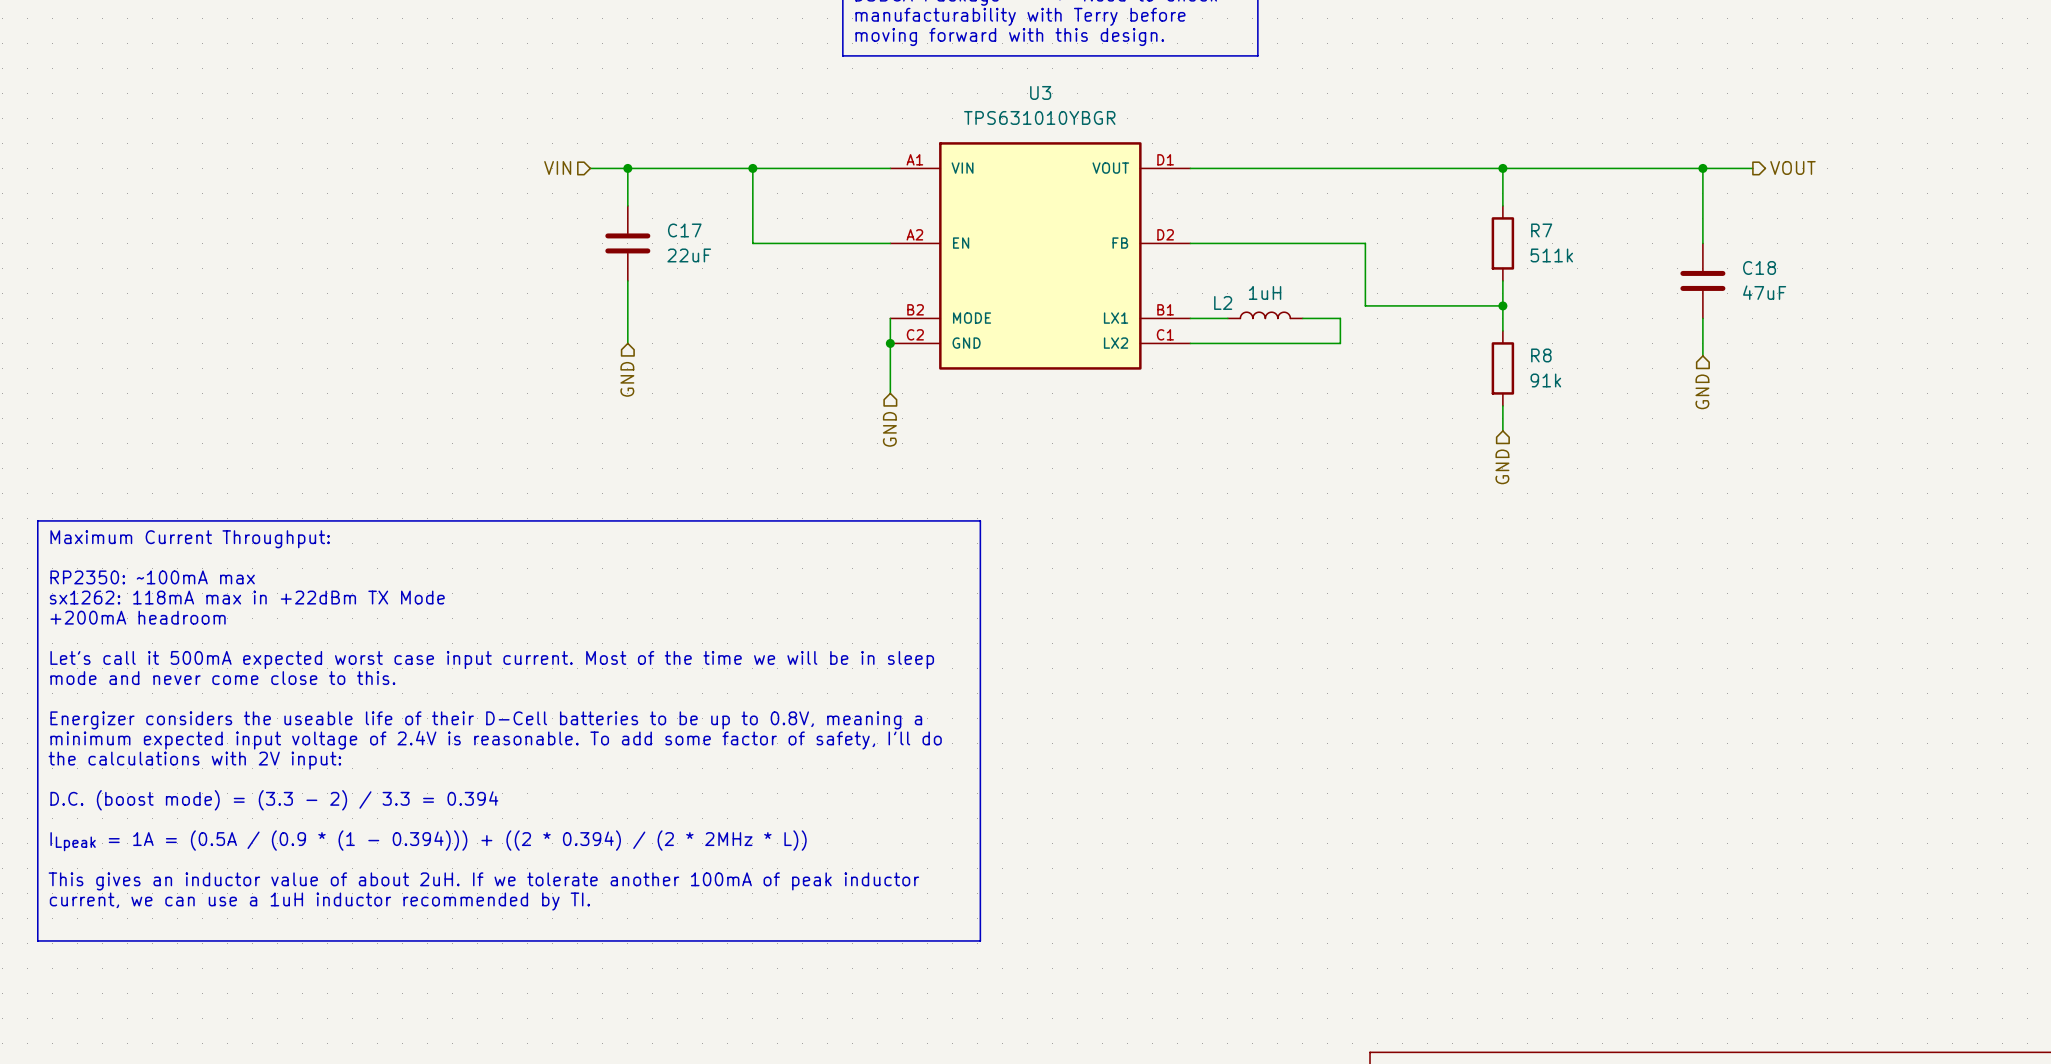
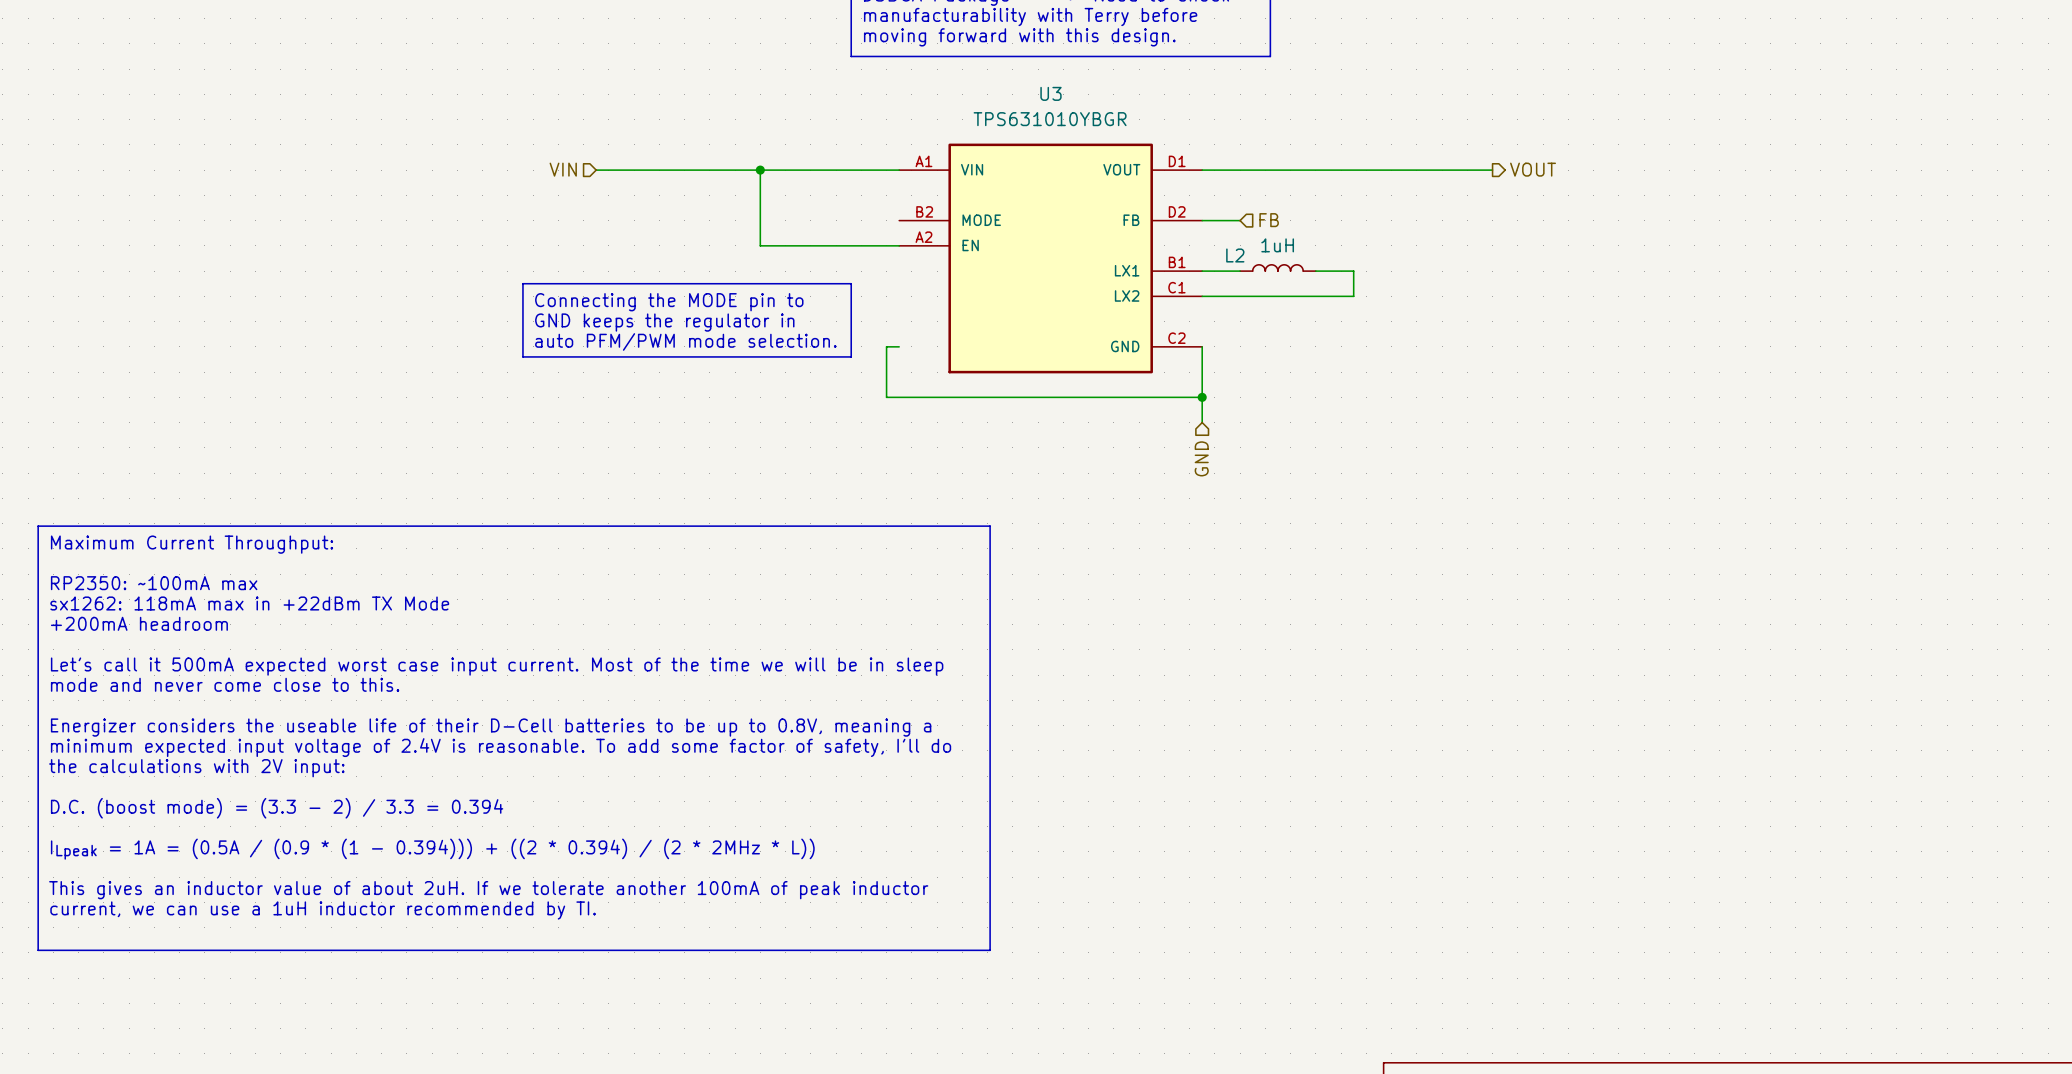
U3 symbol: [890, 142, 1191, 370] -> [899, 143, 1203, 374]
hierarchical label: none -> VOUT (1533, 169)
hierarchical label: VOUT (1792, 167) -> none
wire: (627, 168) (627, 205) -> none
junction: (627, 168) -> none
wire: (1477, 168) (1752, 168) -> none
wire: (1502, 168) (1502, 205) -> none
junction: (1502, 168) -> none
wire: (1702, 168) (1702, 243) -> none
junction: (1702, 168) -> none
hierarchical label: none -> FB (1269, 220)
wire: none -> (1202, 220) (1240, 220)
C17: 22uF (627, 243) -> none
wire: (1190, 243) (1365, 243) (1365, 305) (1502, 305) -> none
R7: 511k (1502, 243) -> none
wire: none -> (1315, 271) (1353, 271) (1353, 296) (1202, 296)
line: none -> (522, 283) (851, 283) (851, 356) (522, 356) (522, 283)
wire: (627, 280) (627, 343) -> none
wire: (1502, 280) (1502, 330) -> none
C18: 47uF (1702, 280) -> none
text: none -> Connecting the MODE pin to (669, 302)
junction: (1502, 305) -> none
L2 position: (1265, 315) -> (1277, 267)
wire: (890, 318) (890, 393) -> none
wire: (1190, 318) (1227, 318) -> (1202, 271) (1240, 271)
wire: (1302, 318) (1340, 318) (1340, 343) (1190, 343) -> (1202, 422) (1202, 346)
wire: (1702, 318) (1702, 355) -> none
text: none -> GND keeps the regulator in (664, 322)
text: none -> auto PFM/PWM mode selection. (685, 341)
wire: none -> (899, 346) (886, 346) (886, 397) (1202, 397)
junction: (890, 343) -> none
R8: 91k (1502, 368) -> none
hierarchical label: GND (627, 379) -> none
hierarchical label: GND (1702, 391) -> none
junction: none -> (1202, 397)
wire: (1502, 405) (1502, 430) -> none
hierarchical label: GND (889, 429) -> none
hierarchical label: none -> GND (1201, 458)
hierarchical label: GND (1502, 466) -> none

